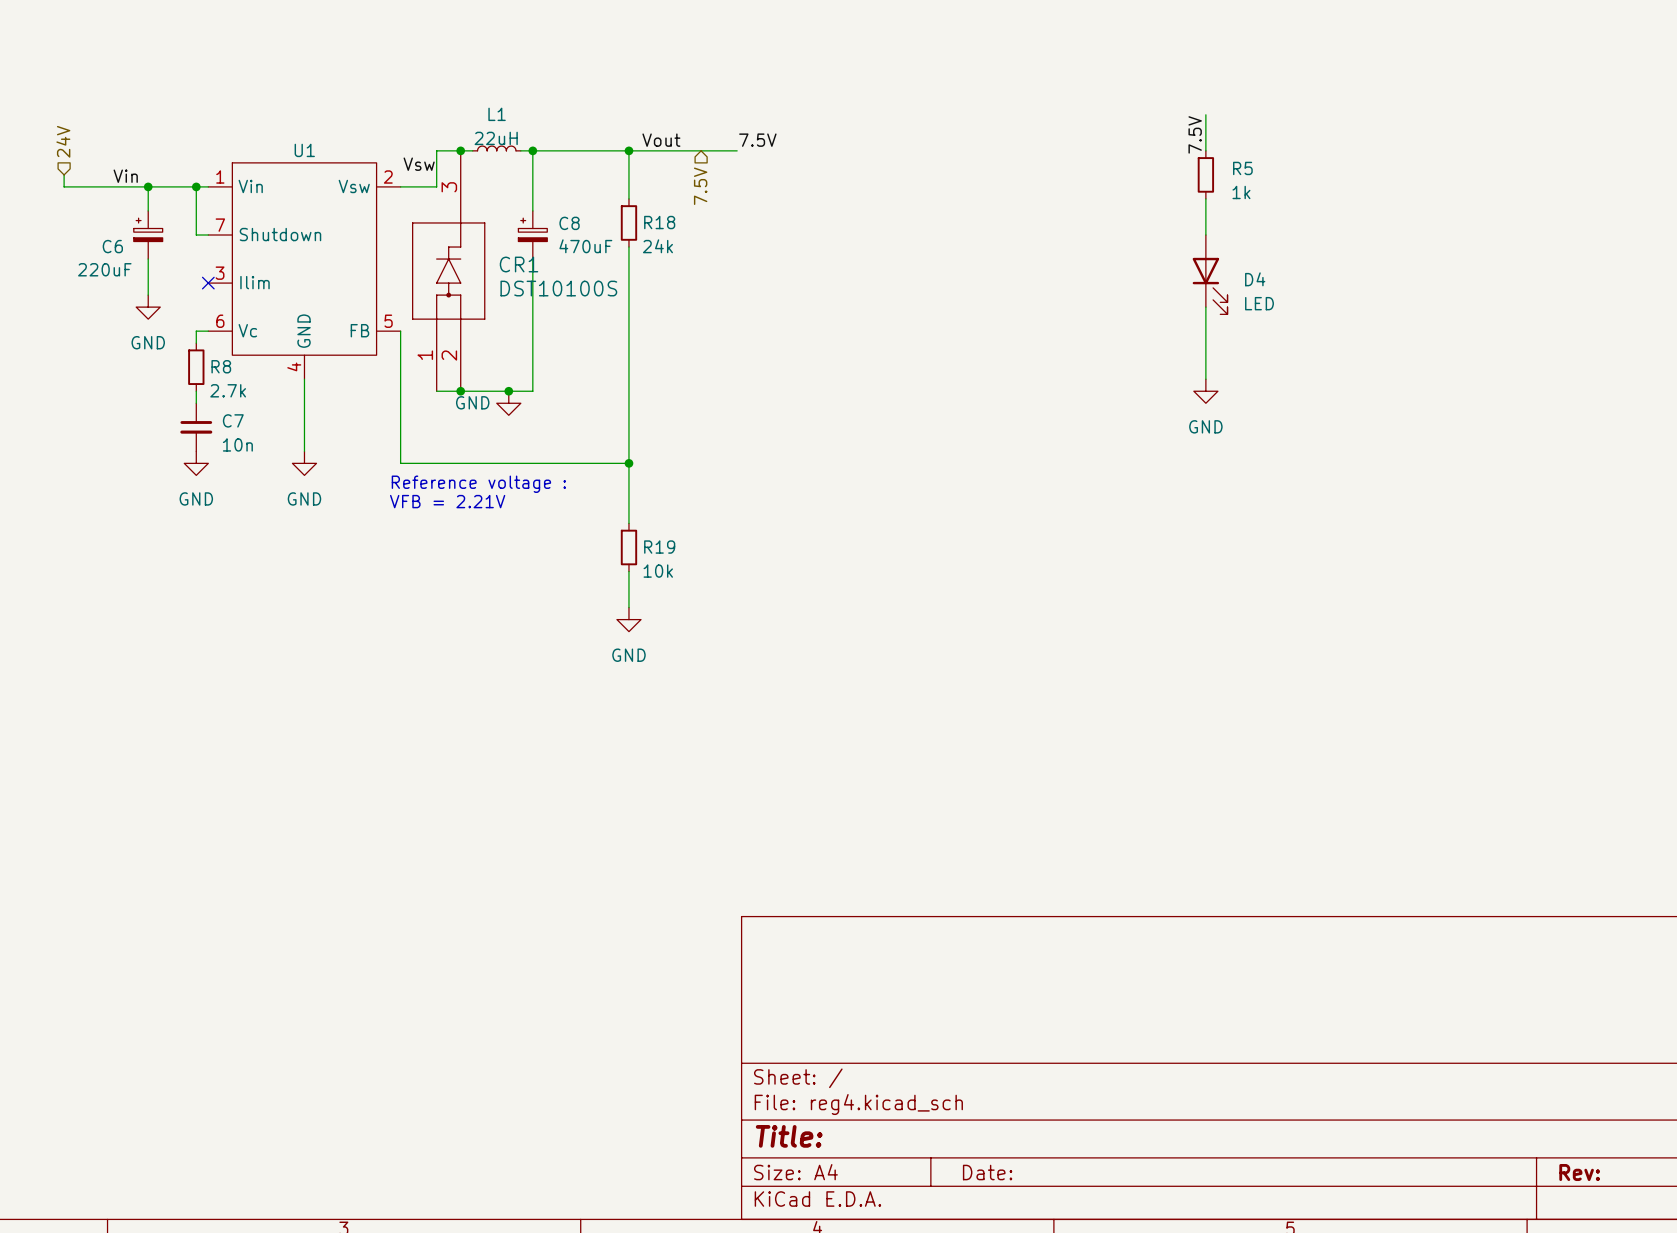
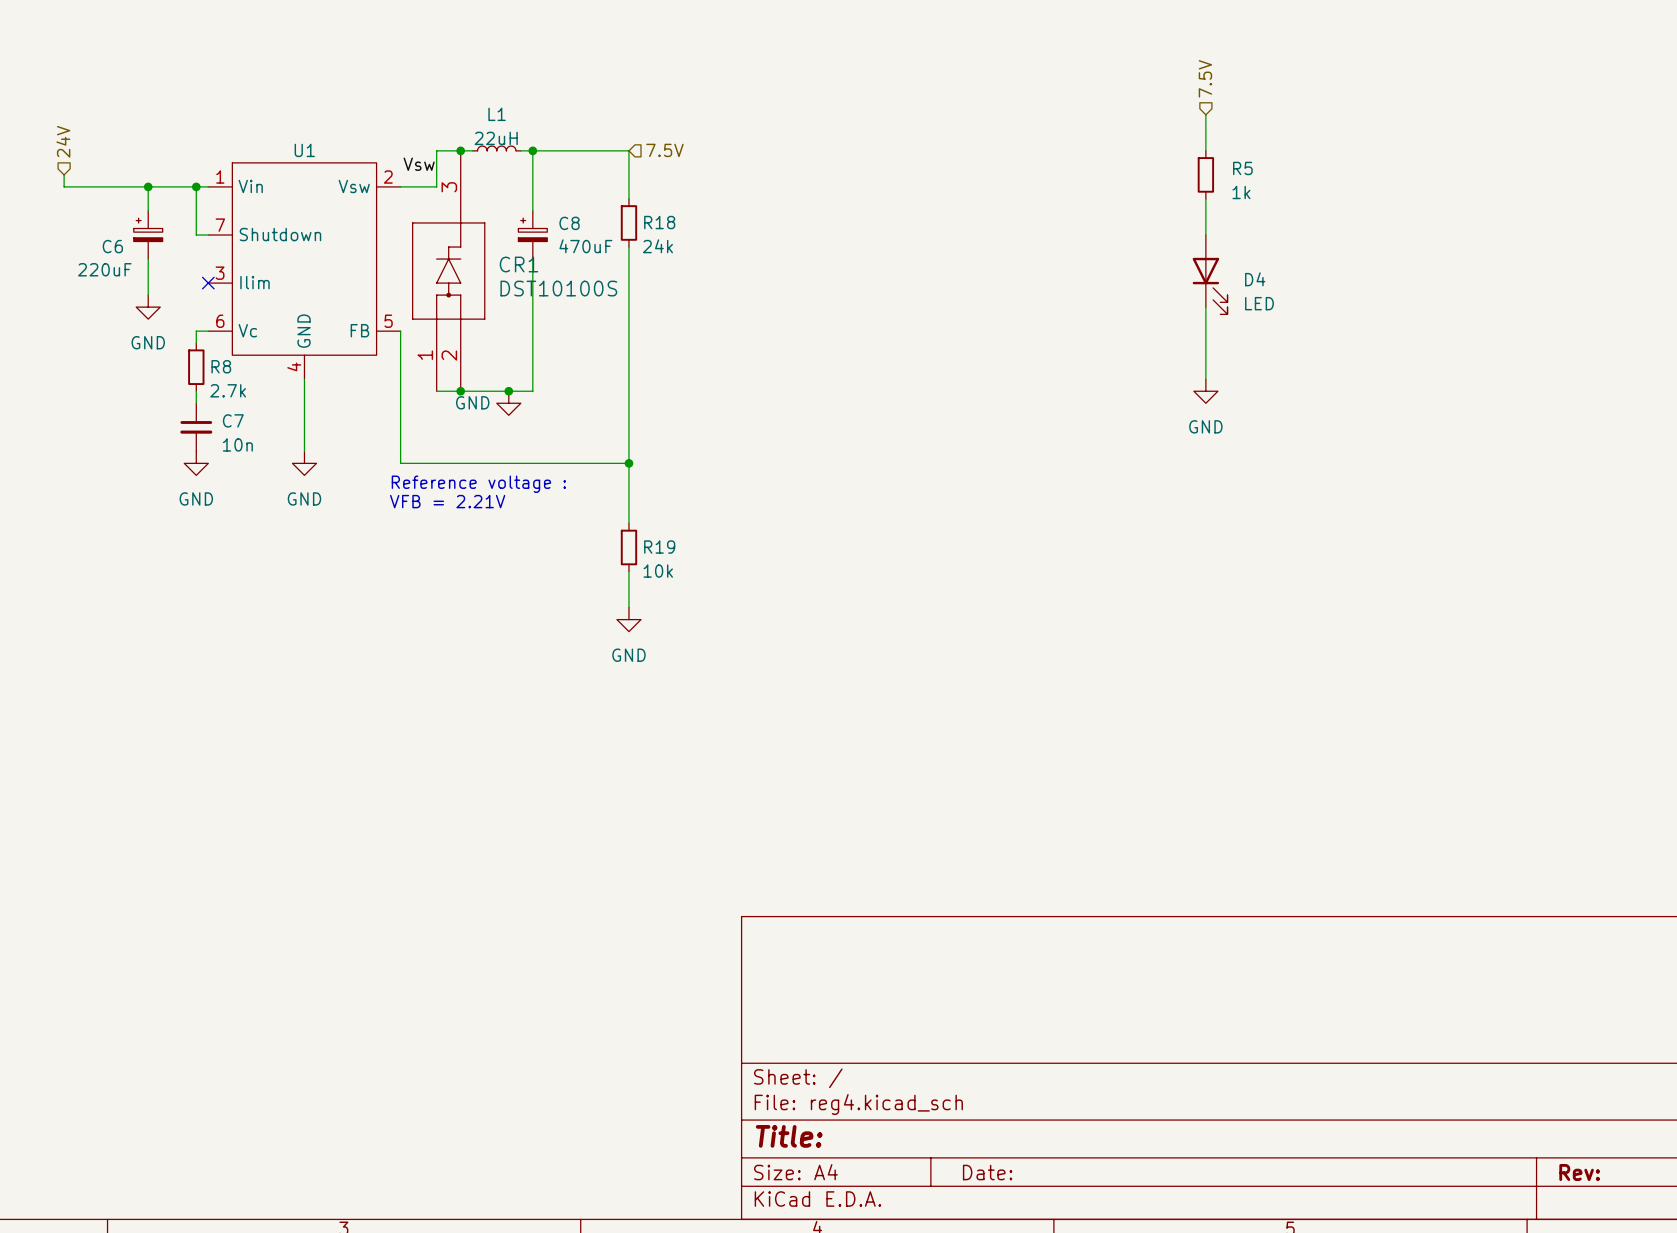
hierarchical label: none -> 7.5V (1205, 78)
label: 7.5V (1195, 134) -> none
label: Vout (661, 140) -> none
label: 7.5V (757, 140) -> none
wire: (628, 150) (737, 150) -> none
junction: (628, 150) -> none
label: Vin (125, 176) -> none
hierarchical label rotation: 0° (700, 186) -> 90° counterclockwise (664, 150)

